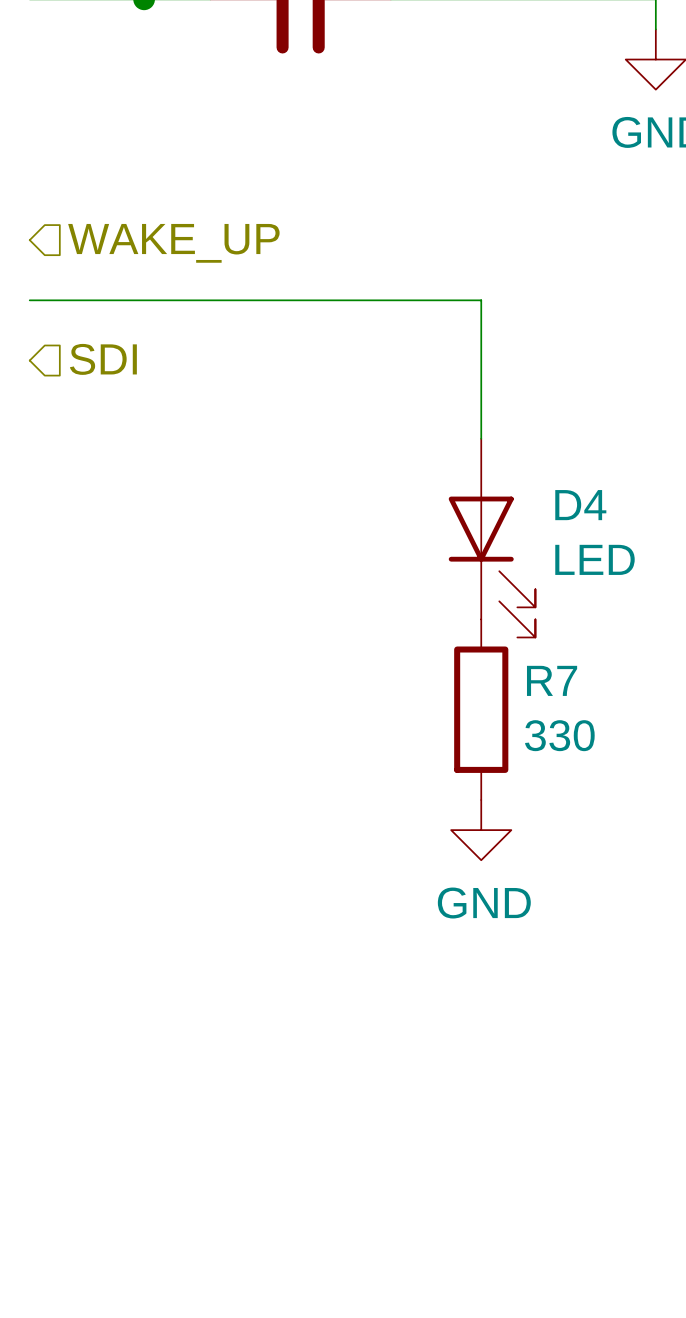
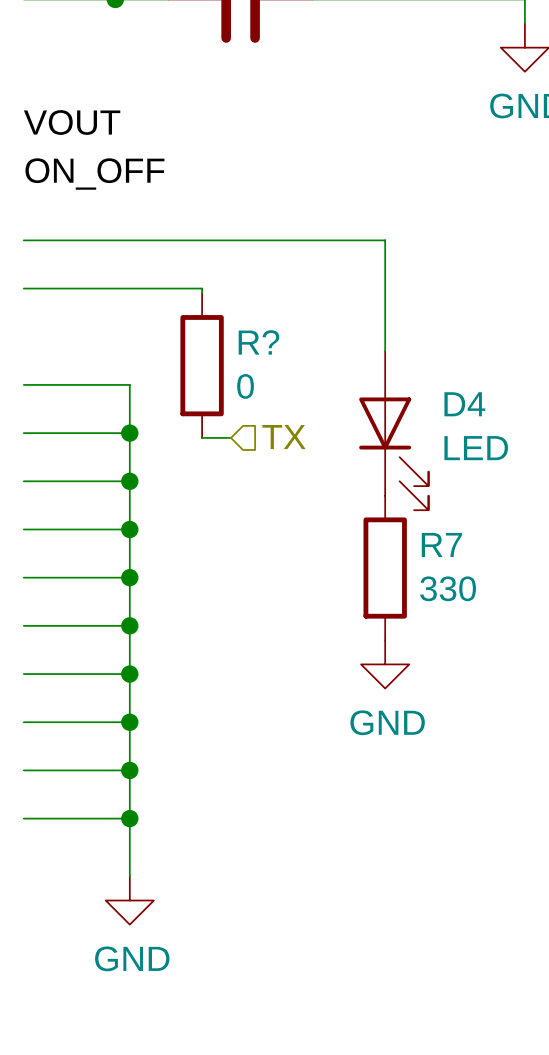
label: none -> VOUT (72, 122)
label: none -> ON_OFF (94, 173)
hierarchical label: WAKE_UP (173, 243) -> none
hierarchical label: SDI (103, 359) -> none
wire: none -> (23, 288) (202, 288) (202, 293)
R?: none -> 0 (202, 365)
wire: none -> (23, 384) (129, 384) (129, 876)
wire: none -> (23, 433) (129, 433)
junction: none -> (129, 433)
hierarchical label: none -> TX (283, 437)
wire: none -> (202, 437) (230, 437)
wire: none -> (23, 481) (129, 481)
junction: none -> (129, 481)
wire: none -> (23, 529) (129, 529)
junction: none -> (129, 529)
wire: none -> (23, 577) (129, 577)
junction: none -> (129, 577)
wire: none -> (23, 625) (129, 625)
junction: none -> (129, 625)
wire: none -> (23, 674) (129, 674)
junction: none -> (129, 674)
wire: none -> (23, 722) (129, 722)
junction: none -> (129, 722)
wire: none -> (23, 770) (129, 770)
junction: none -> (129, 770)
wire: none -> (23, 818) (129, 818)
junction: none -> (129, 818)
power symbol: none -> GND (129, 900)

